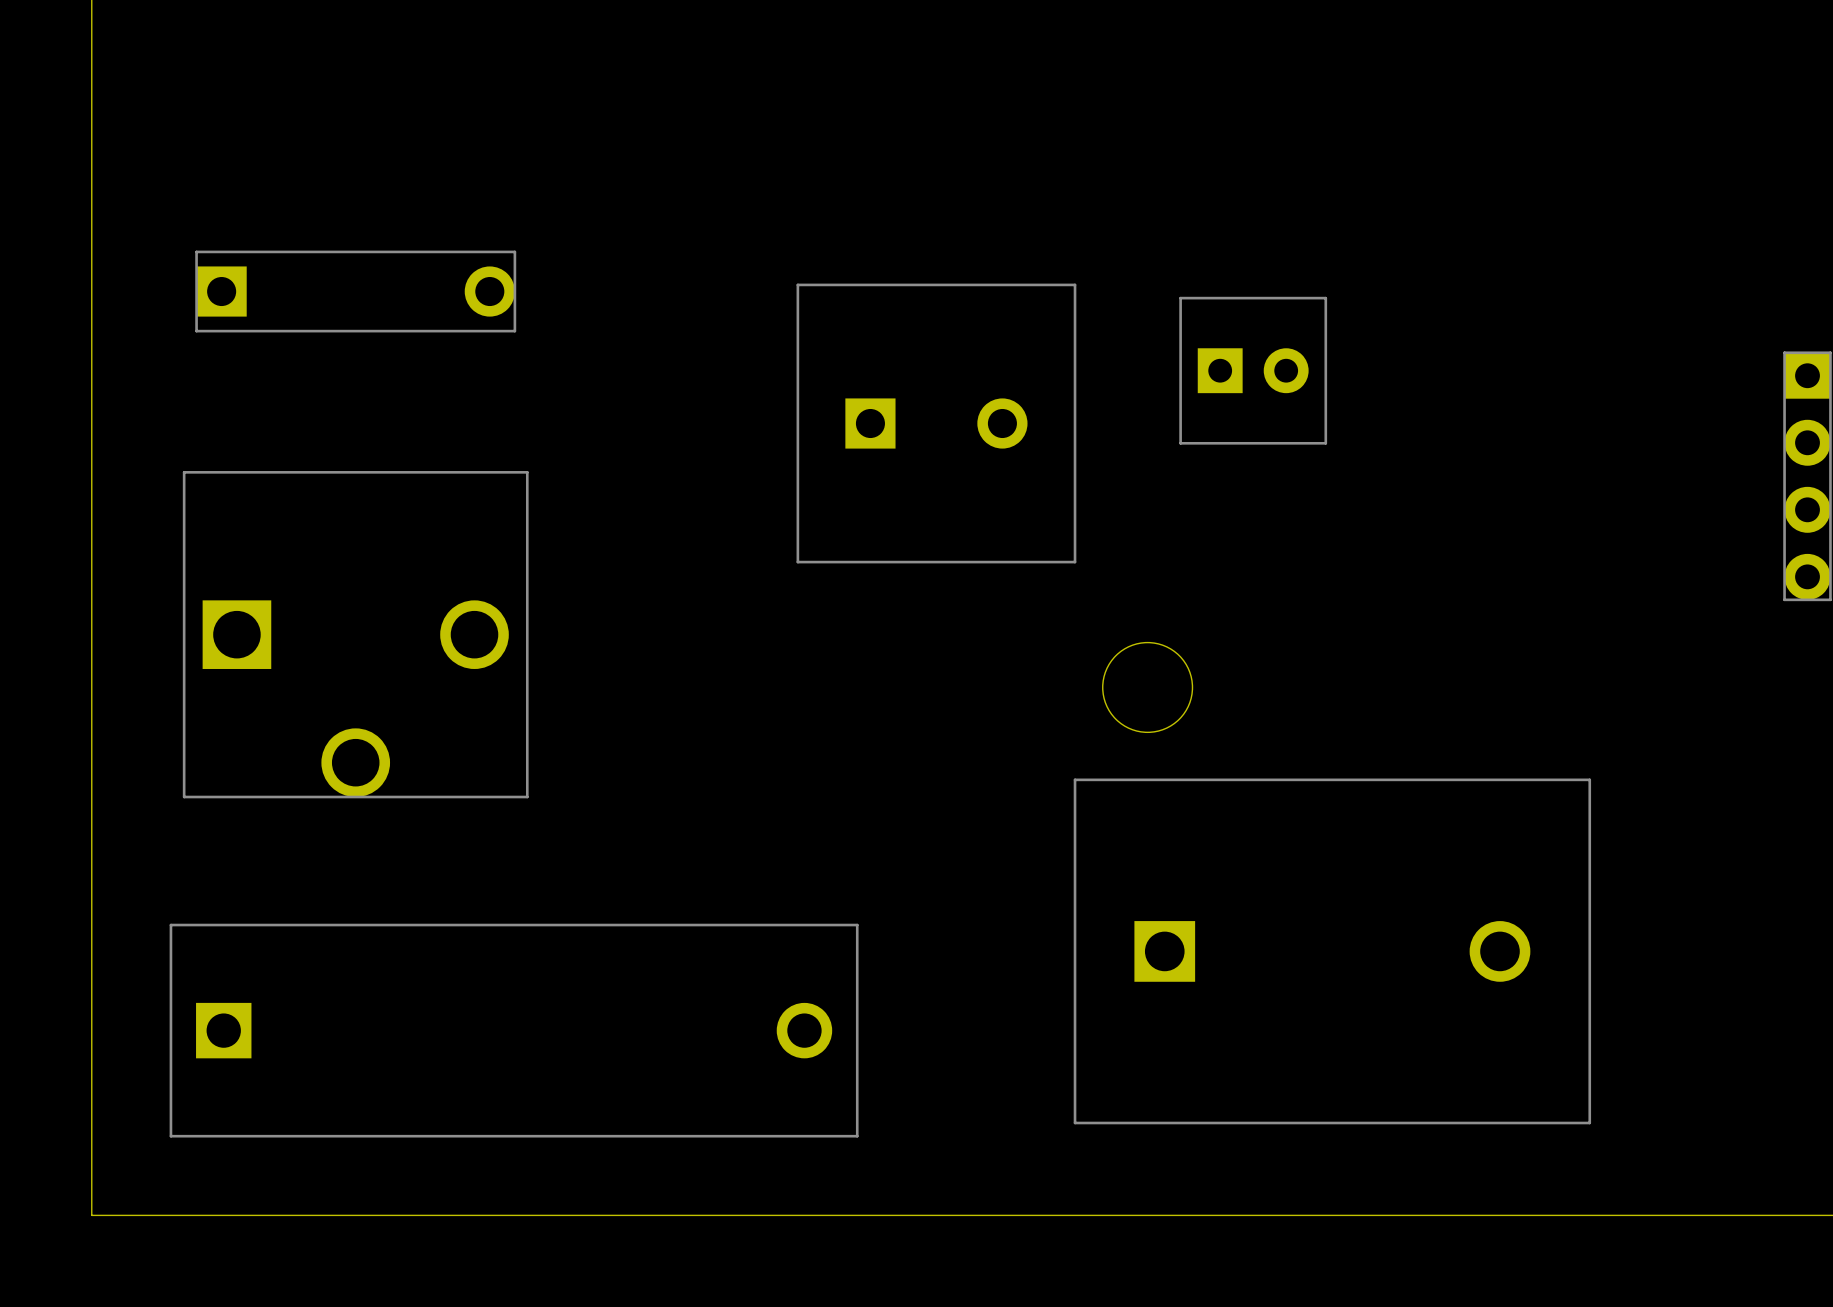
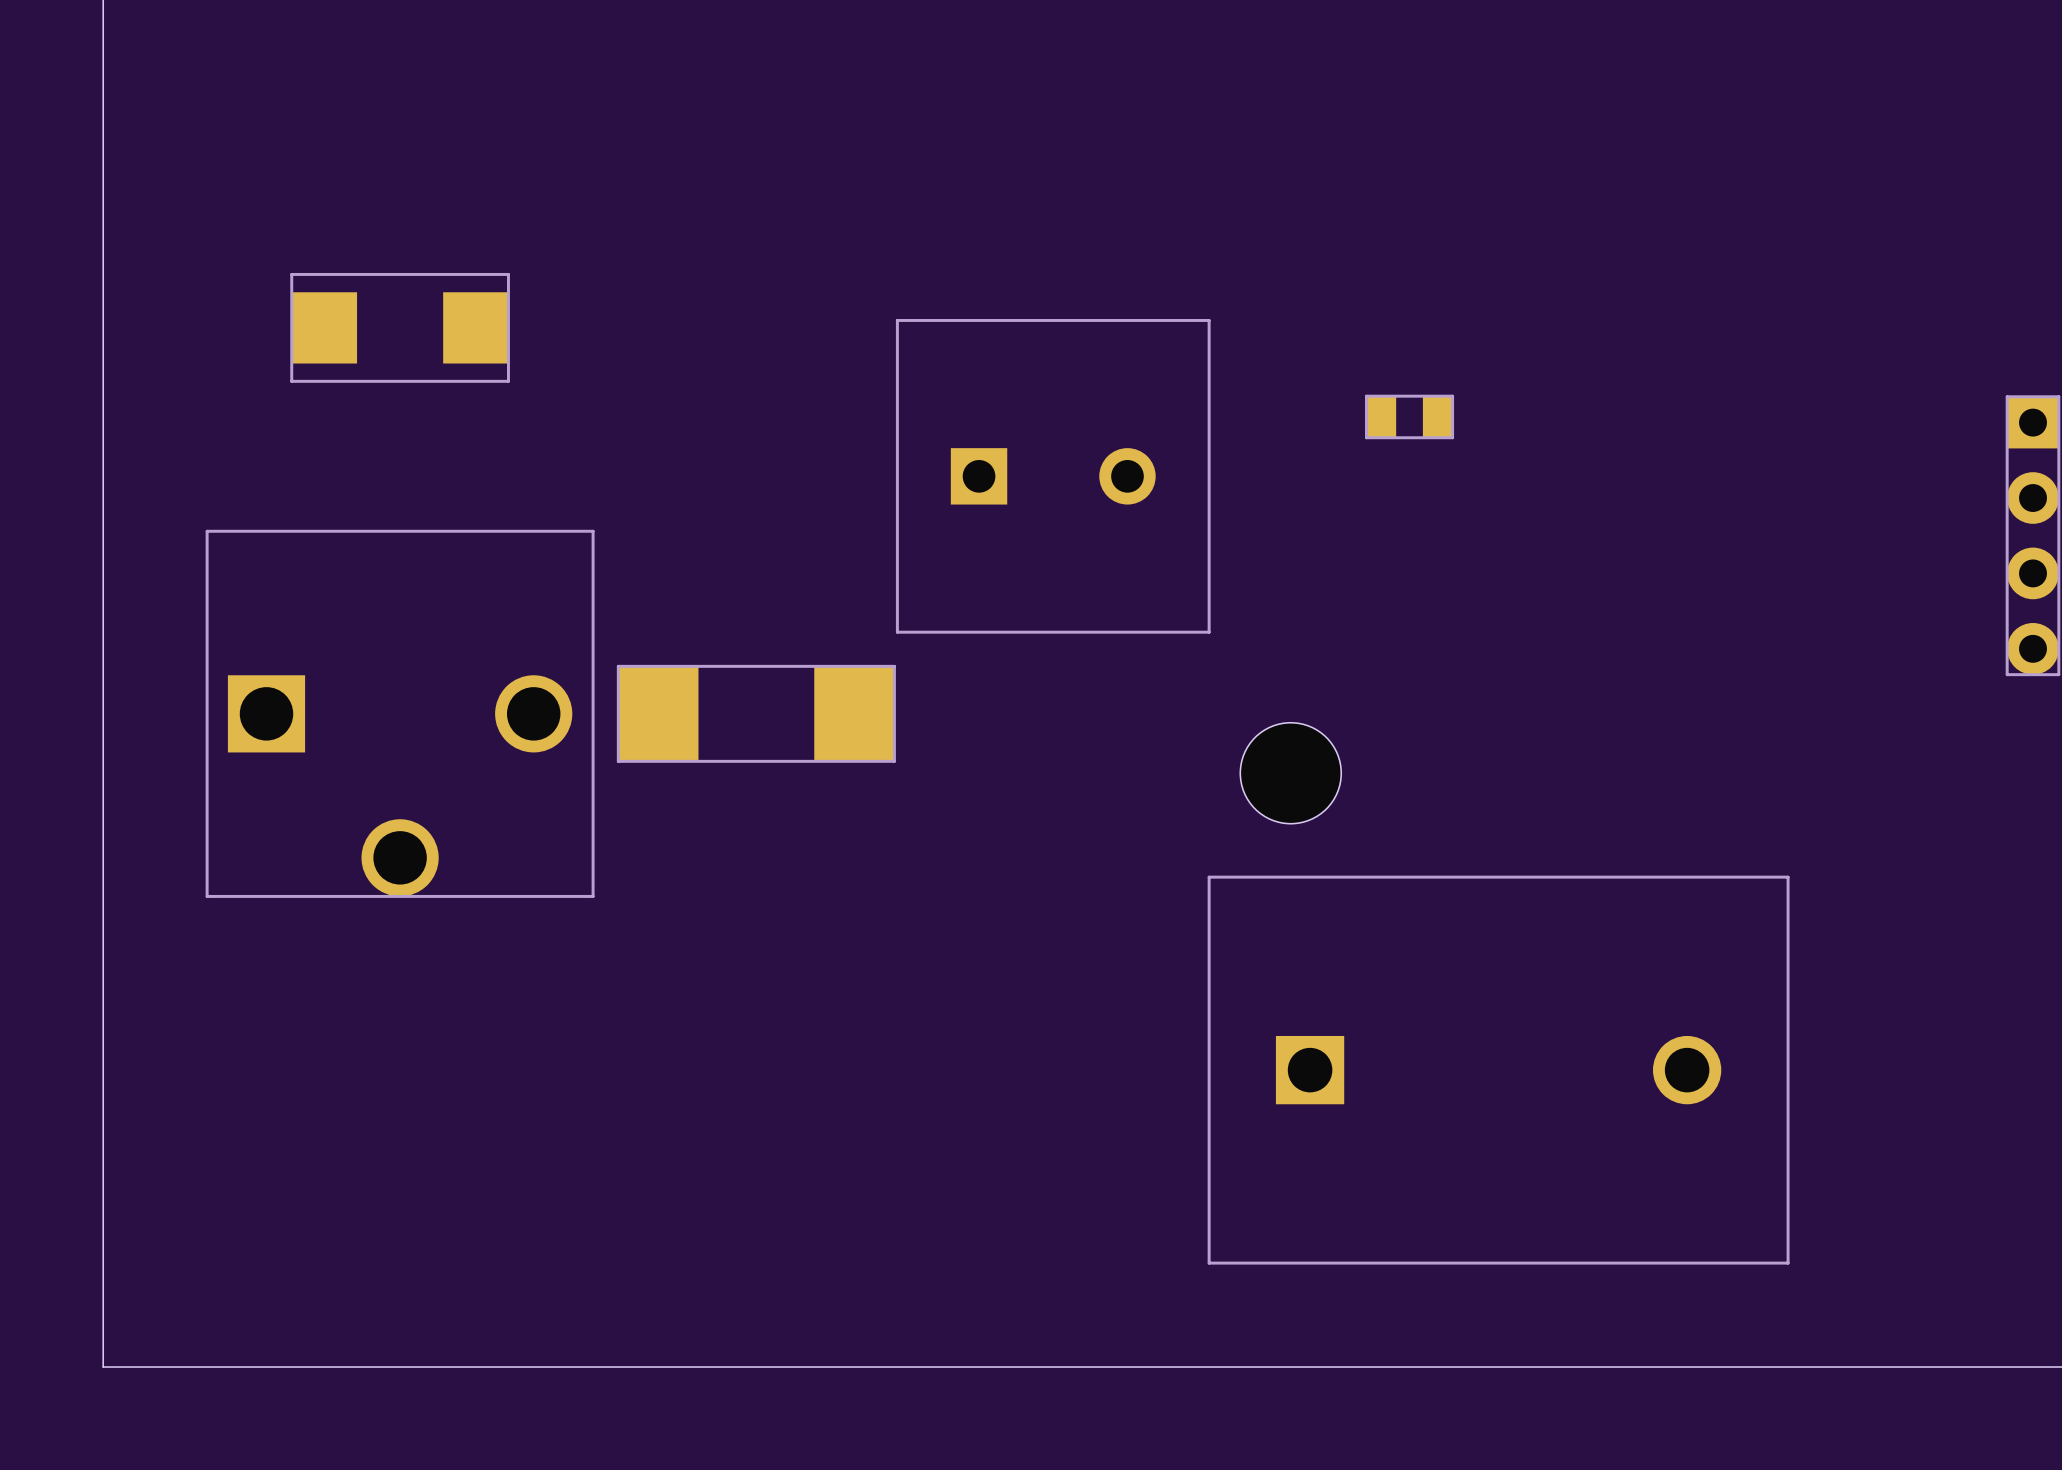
part footprint: [195, 250, 517, 333] -> [290, 272, 510, 383]
part footprint: [1179, 296, 1328, 445] -> [1365, 394, 1455, 440]
part: none -> (756, 713)
part: (514, 1030) -> none

